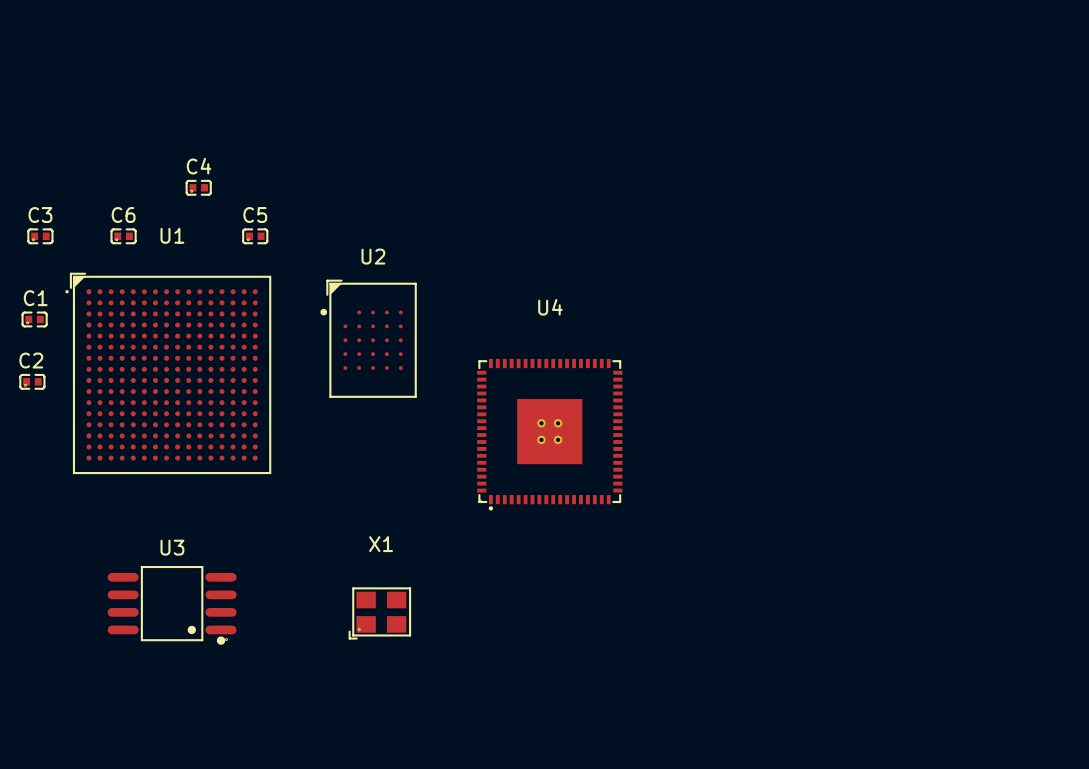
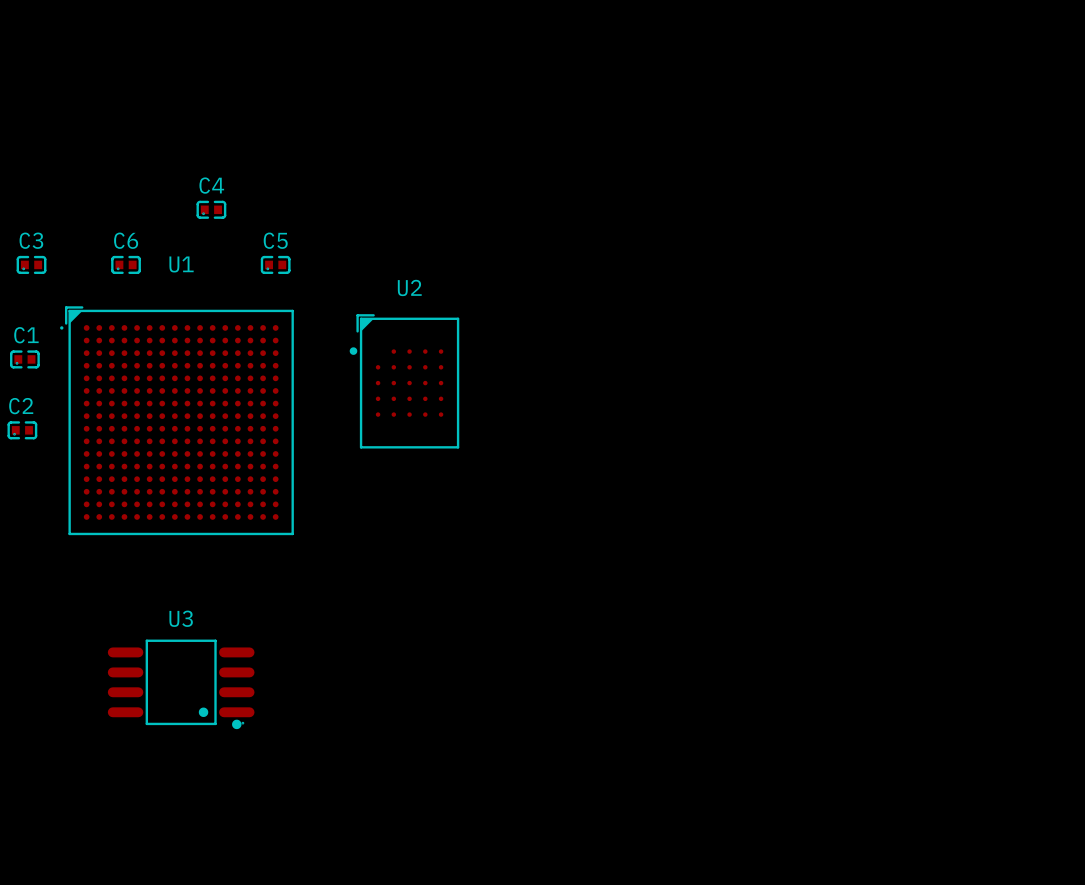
U4: (549, 434) -> none
X1: (379, 613) -> none

